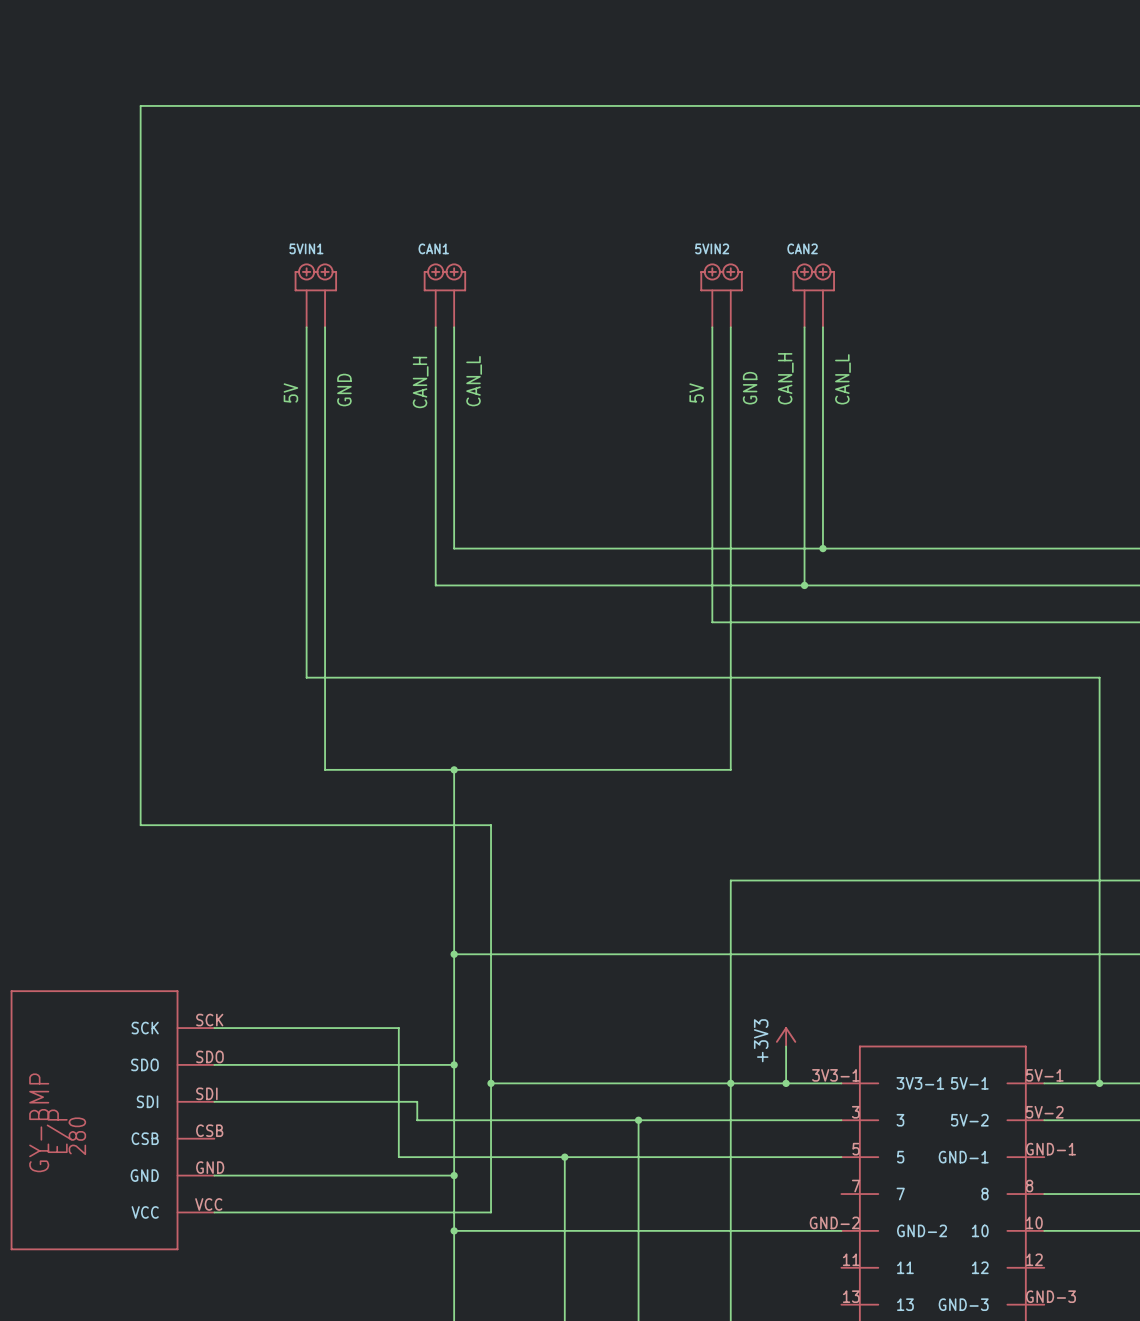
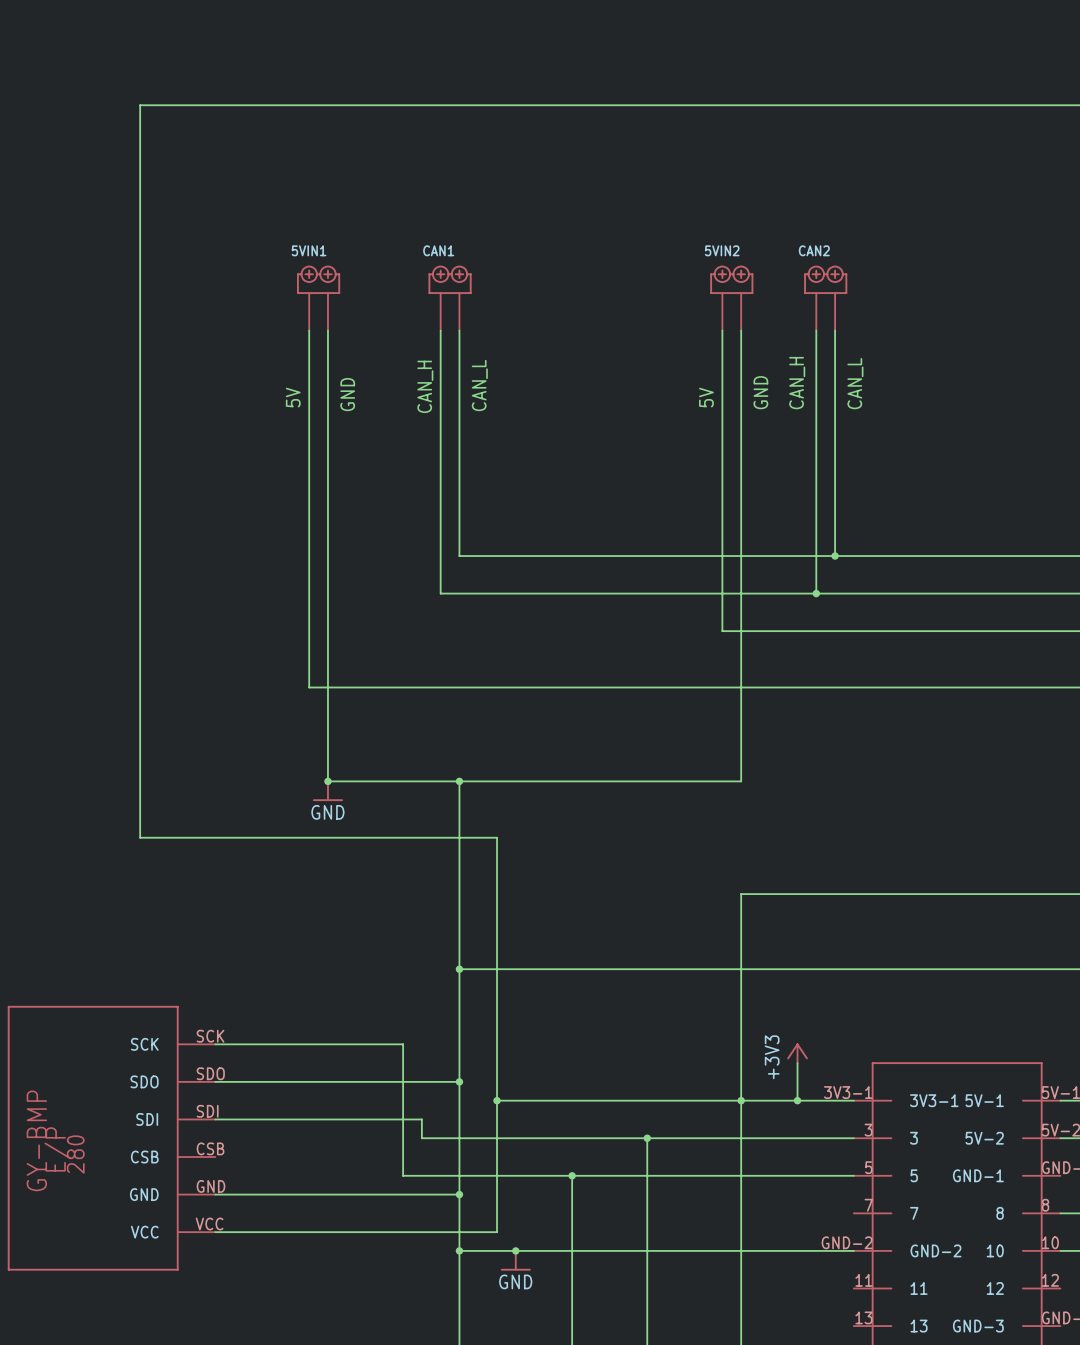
junction: none -> (327, 781)
power symbol: none -> GND (327, 791)
junction: none -> (515, 1250)
power symbol: none -> GND (515, 1260)

